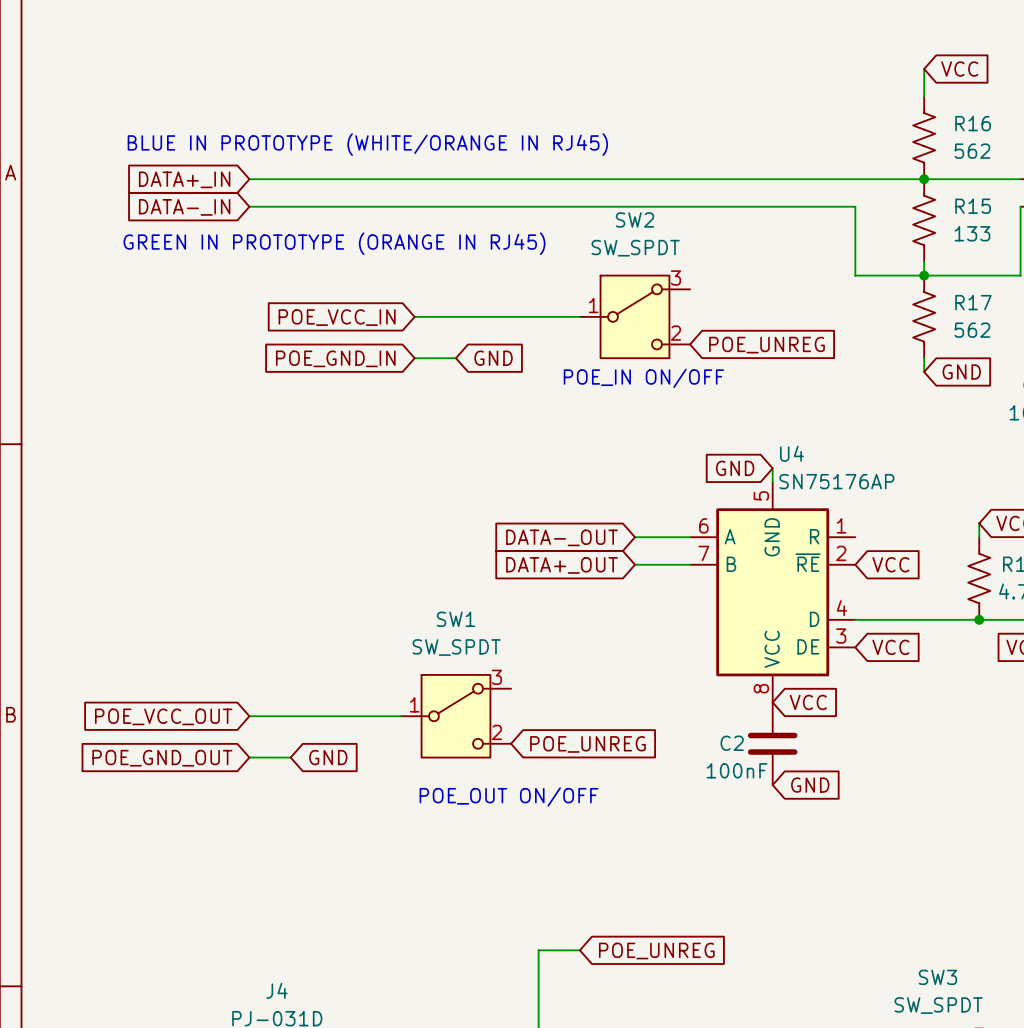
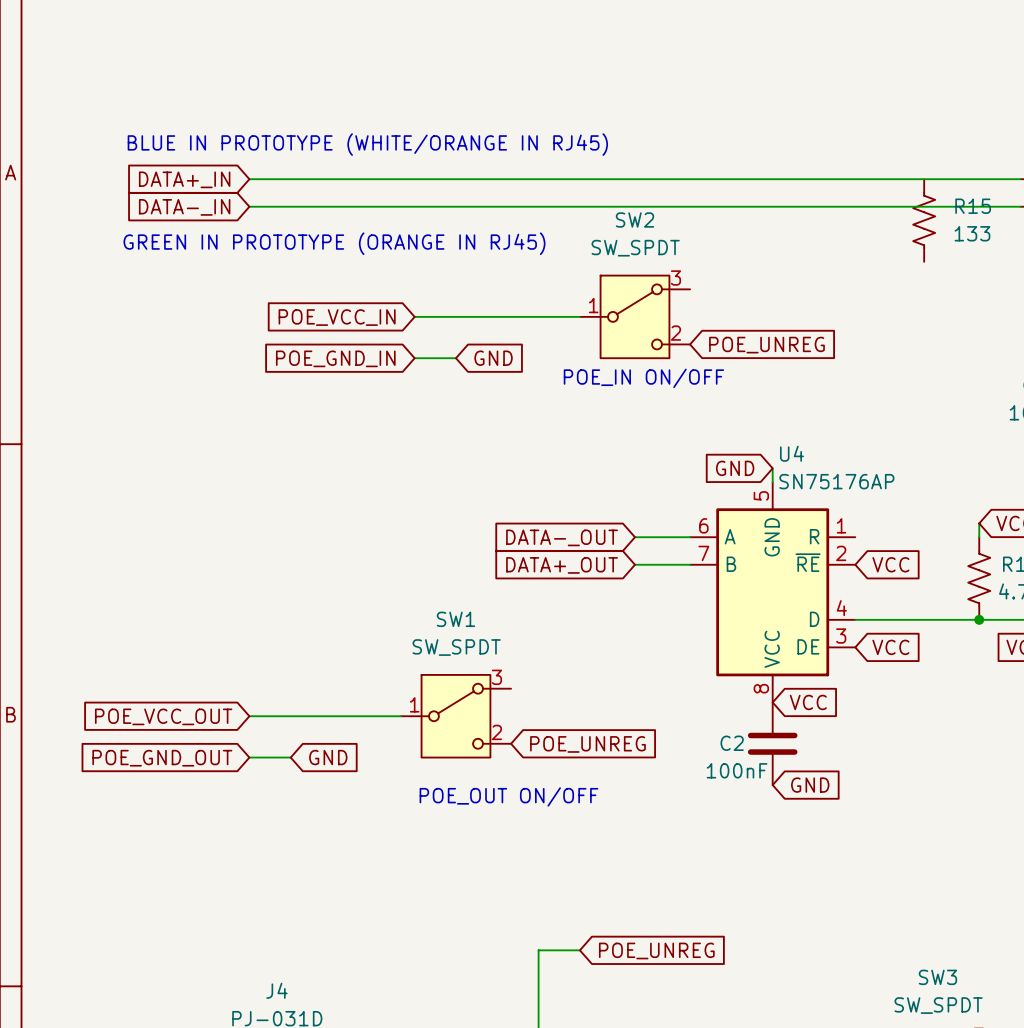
wire: (924, 69) (924, 96) -> none
global label: VCC (959, 69) -> none
R16: 562 (924, 137) -> none
junction: (924, 179) -> none
wire: (855, 206) (855, 275) (1020, 275) (1020, 206) -> (855, 206) (1020, 206)
wire: (924, 261) (924, 275) -> none
junction: (924, 275) -> none
R17: 562 (924, 316) -> none
wire: (924, 358) (924, 371) -> none
global label: GND (961, 371) -> none

